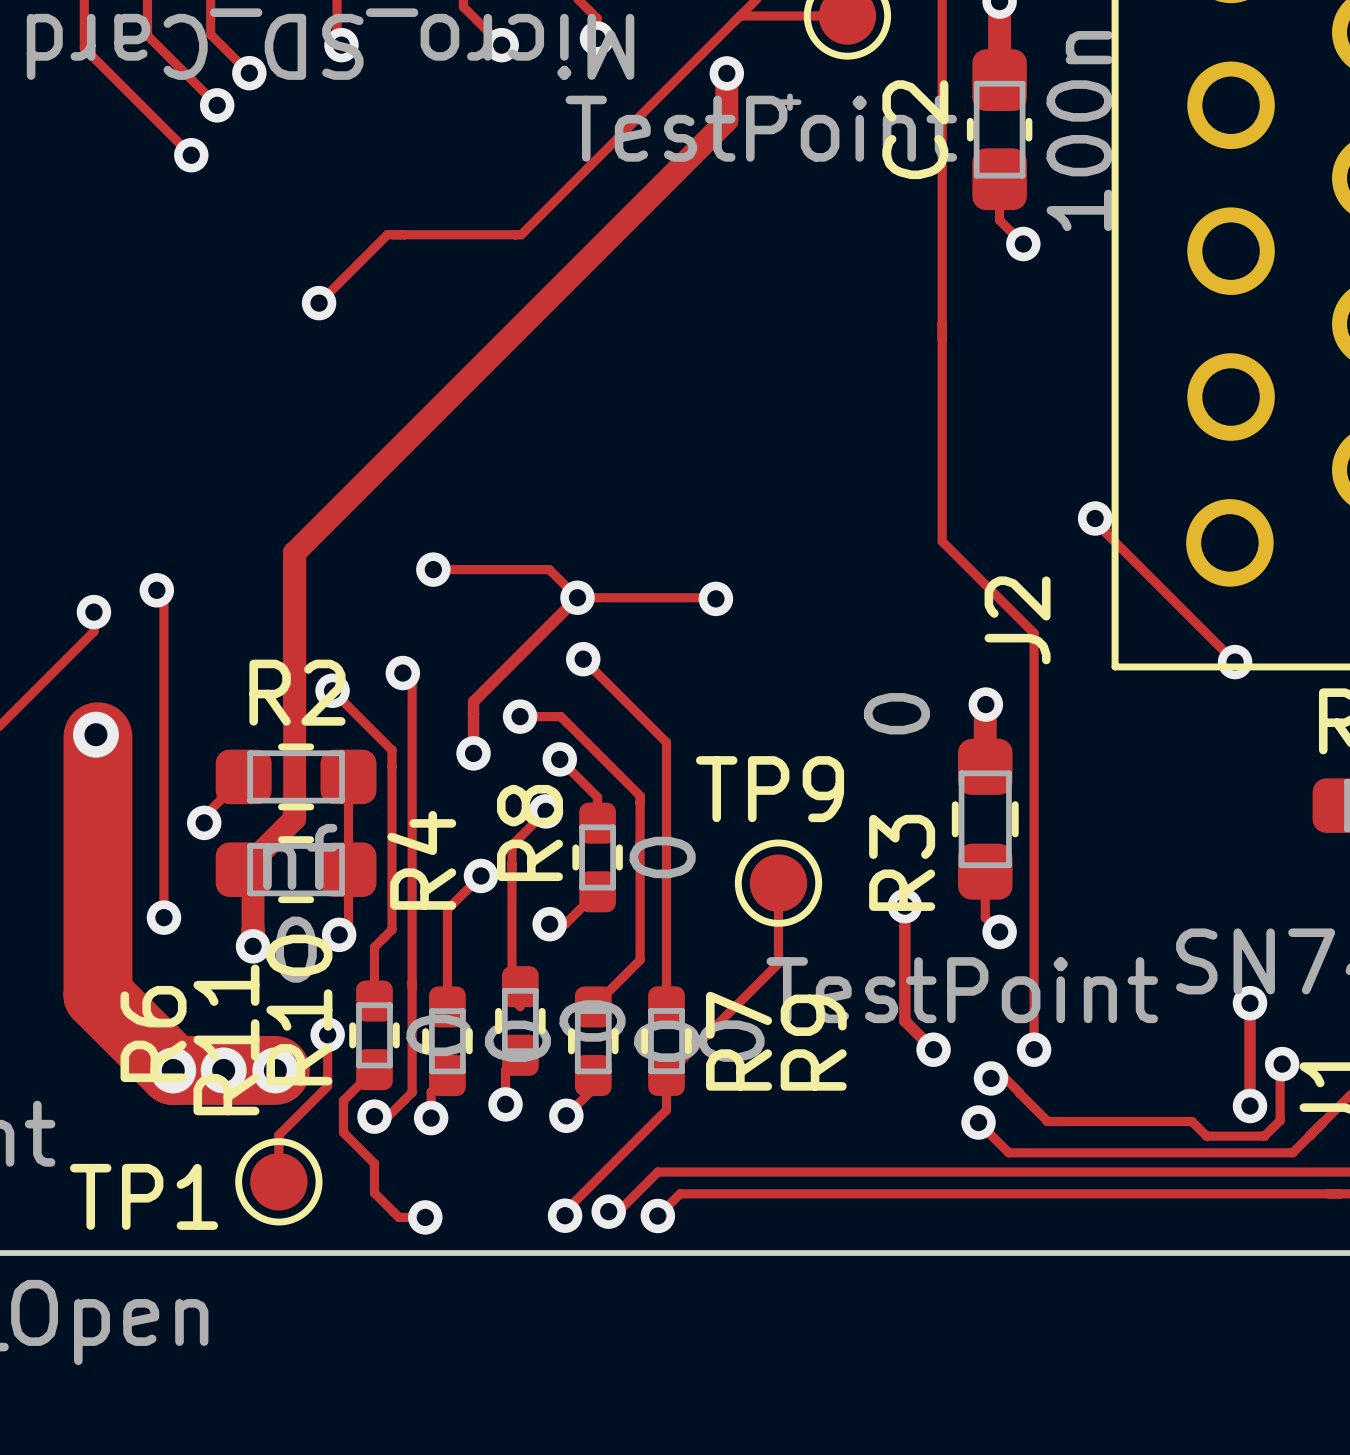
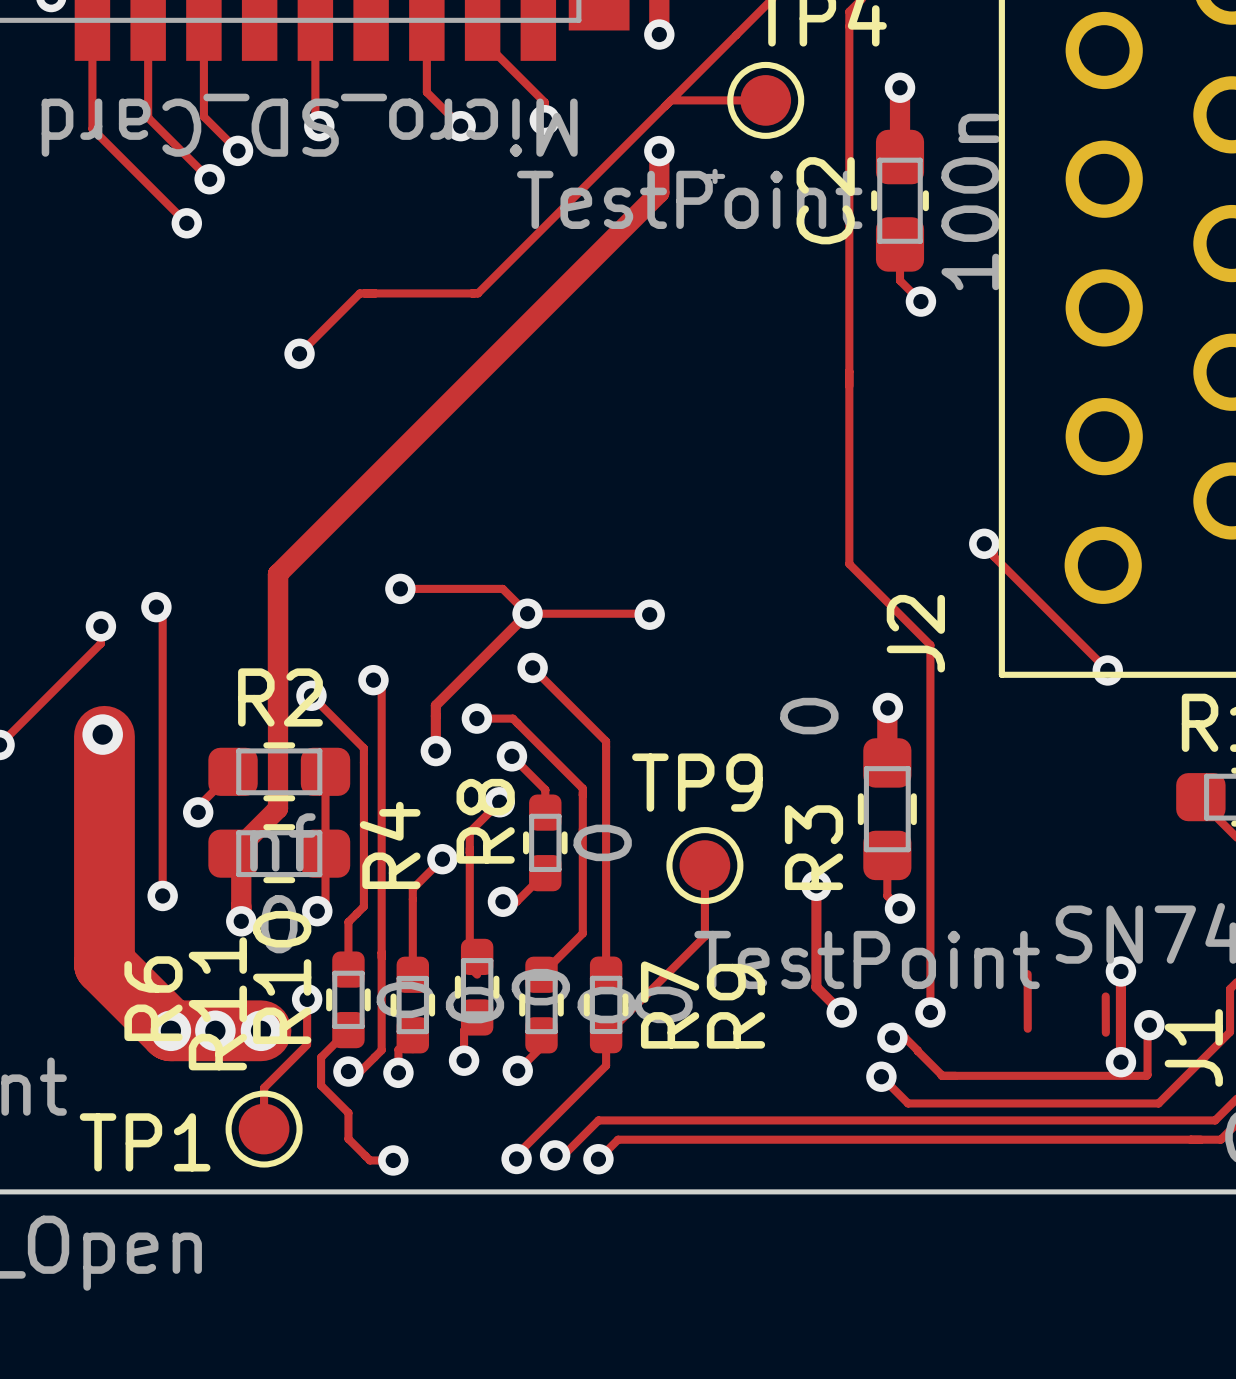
track: none -> (1027, 974) (1027, 1028)
track: none -> (1105, 996) (1105, 1032)
track: (1192, 1121) (1206, 1136) (1264, 1136) (1279, 1121) -> (1069, 1075) (1146, 1075)

